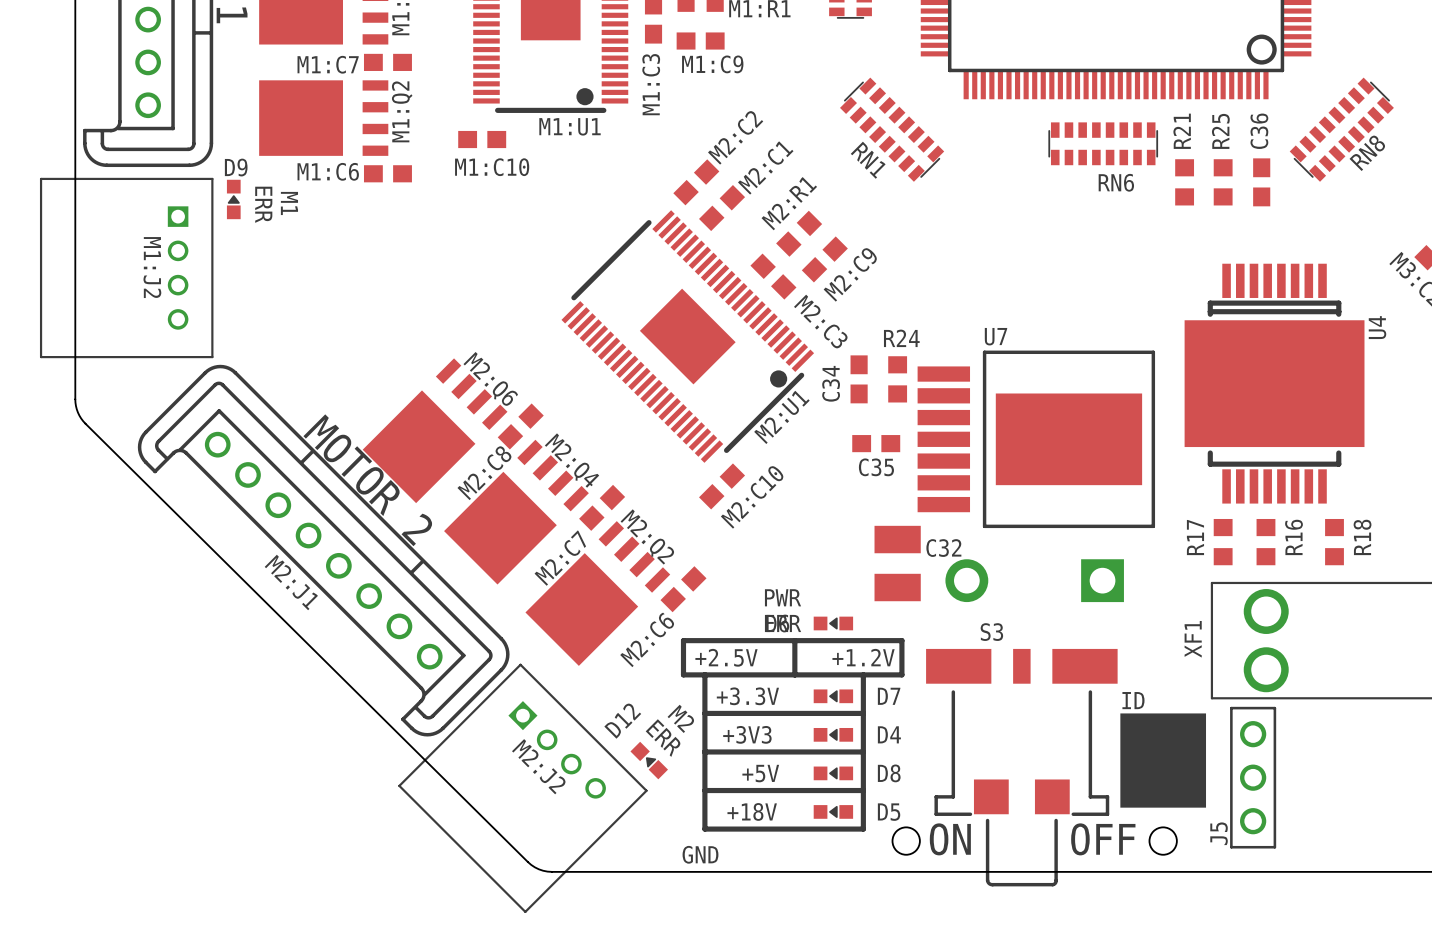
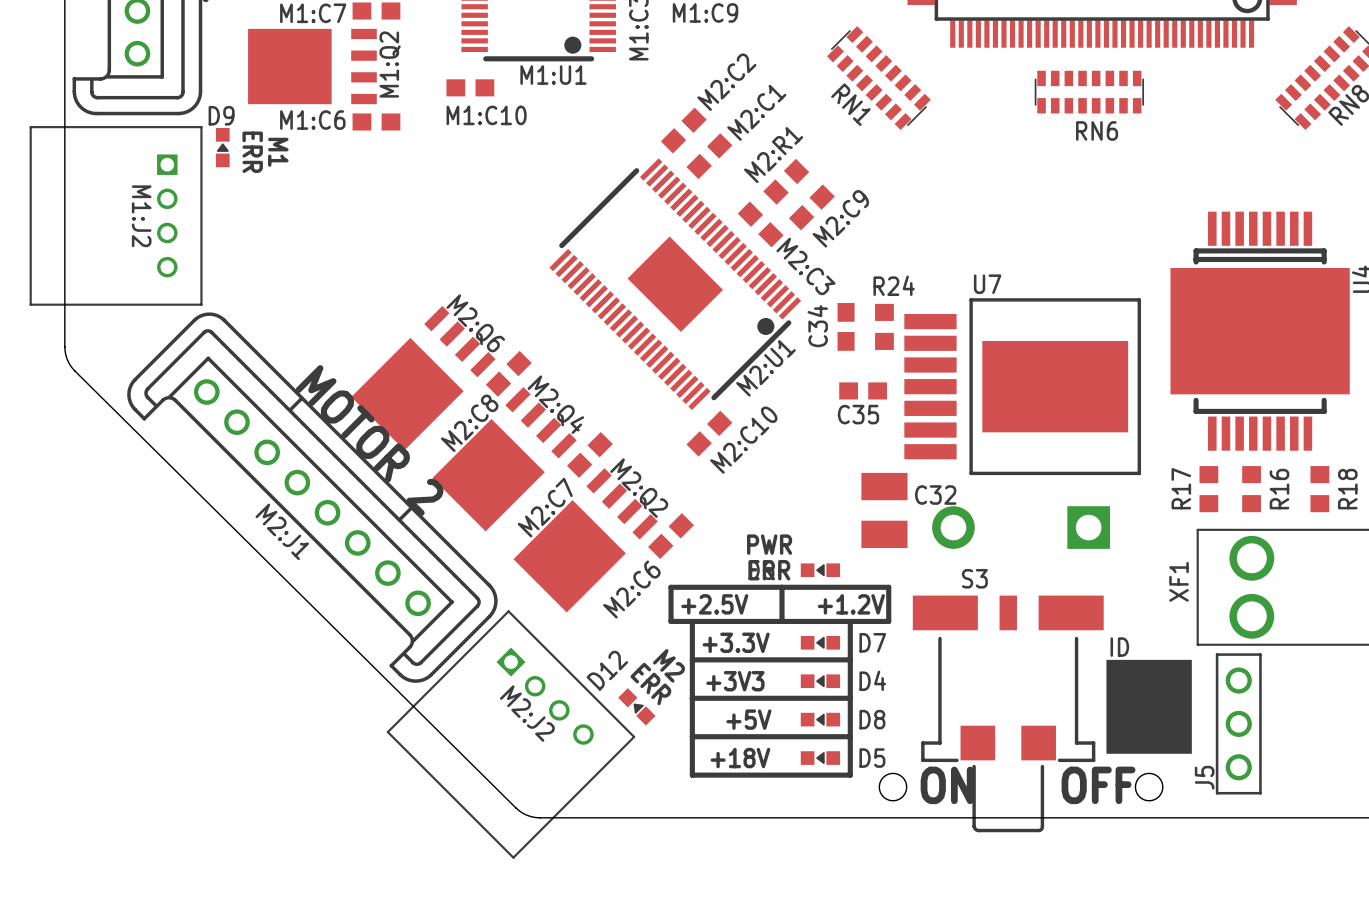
R21: (1184, 182) -> none
R25: (1223, 182) -> none
C36: (1261, 182) -> none
text: GND (700, 854) -> none

